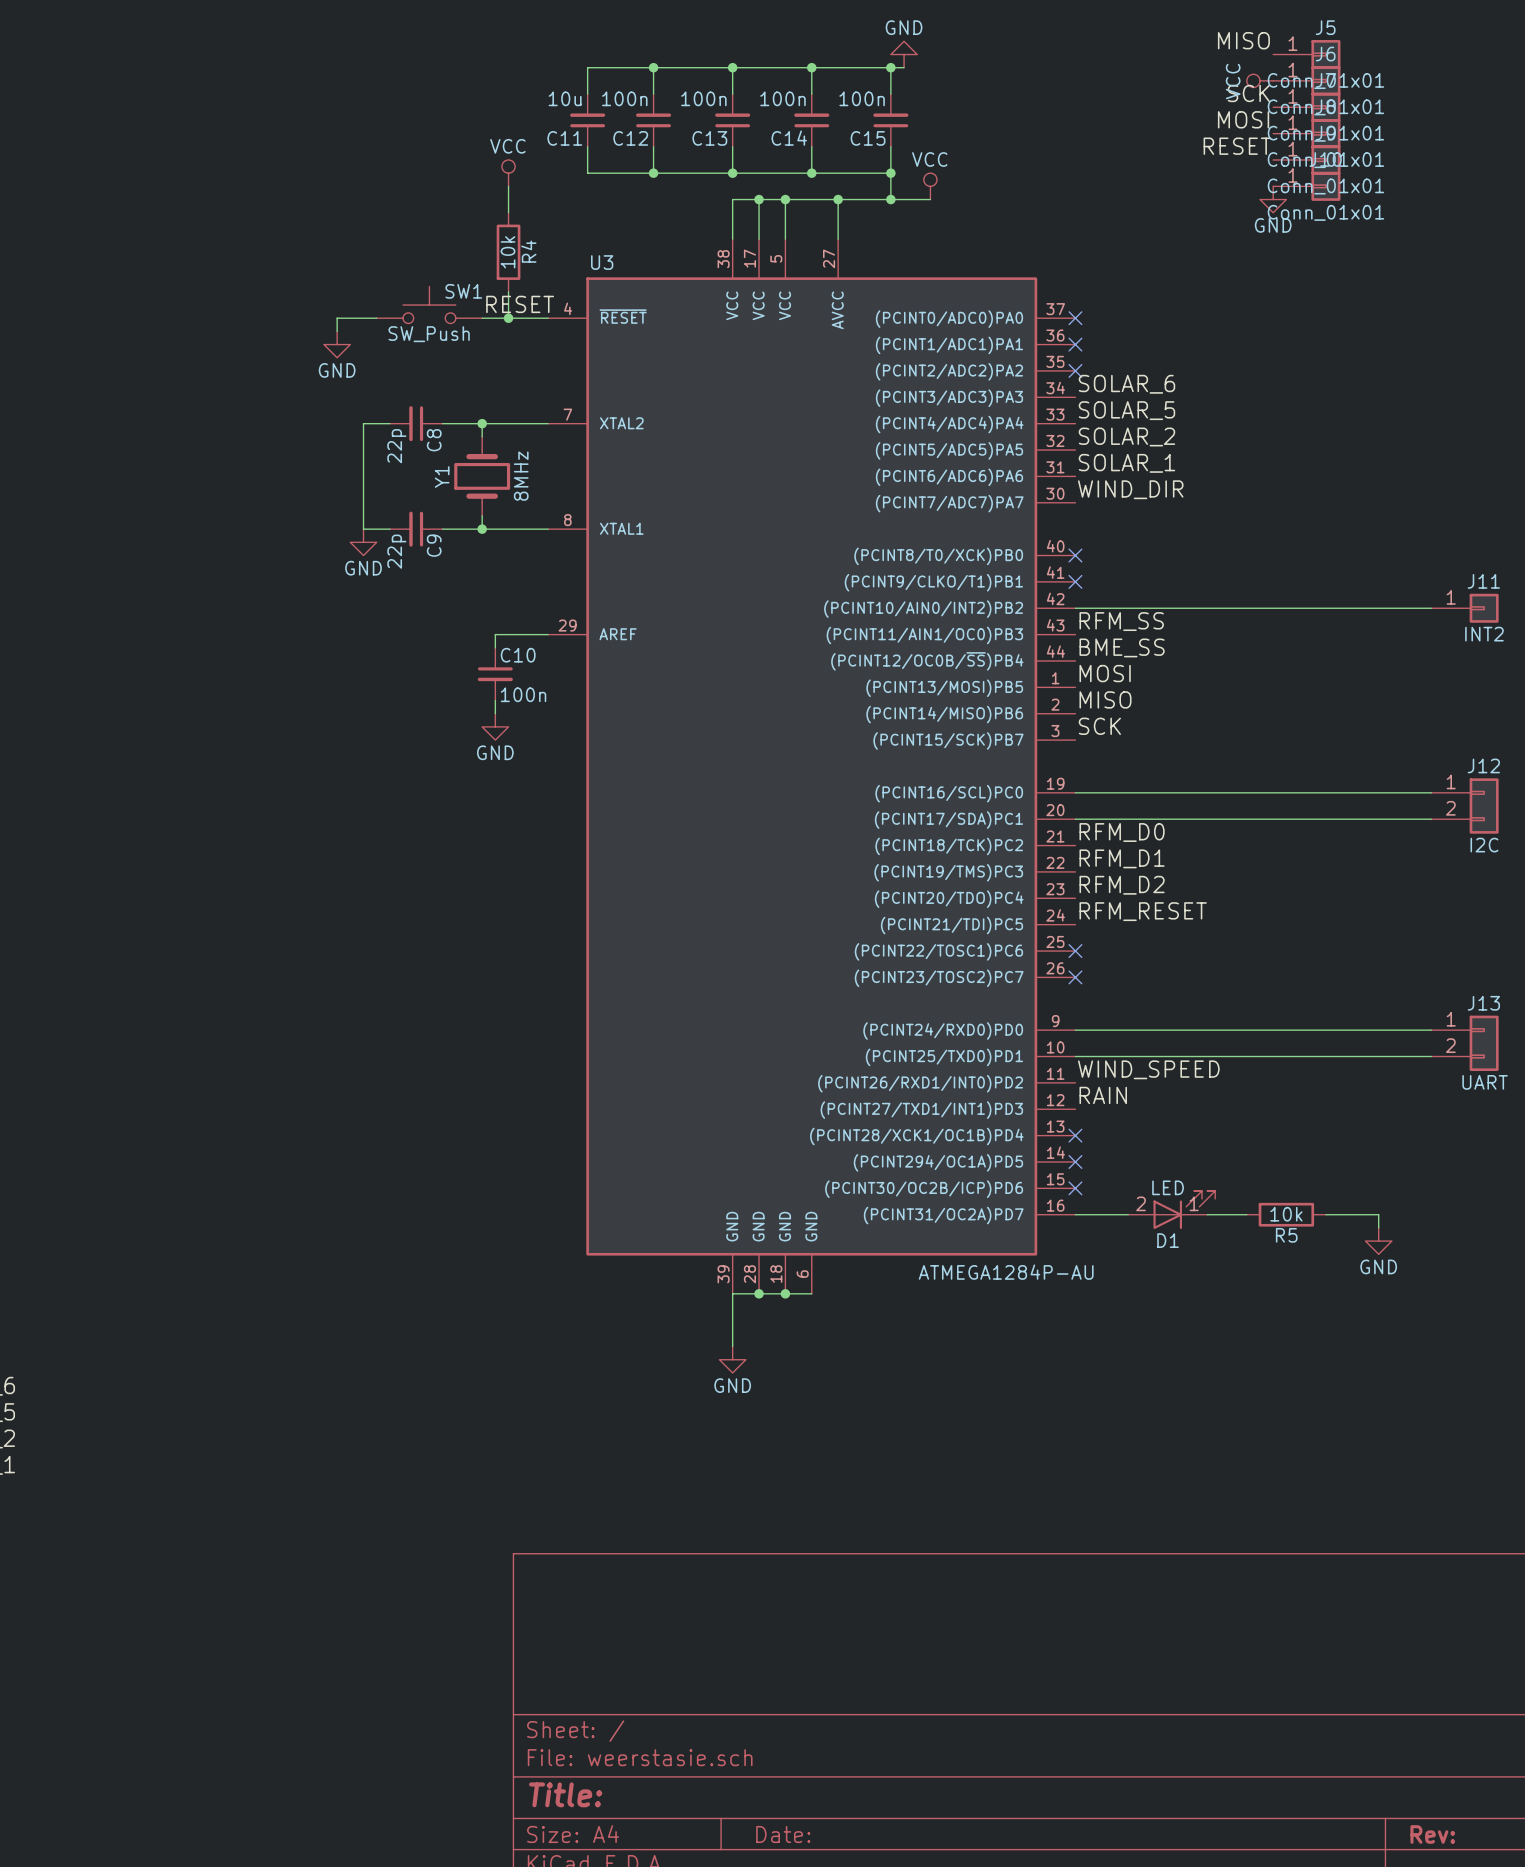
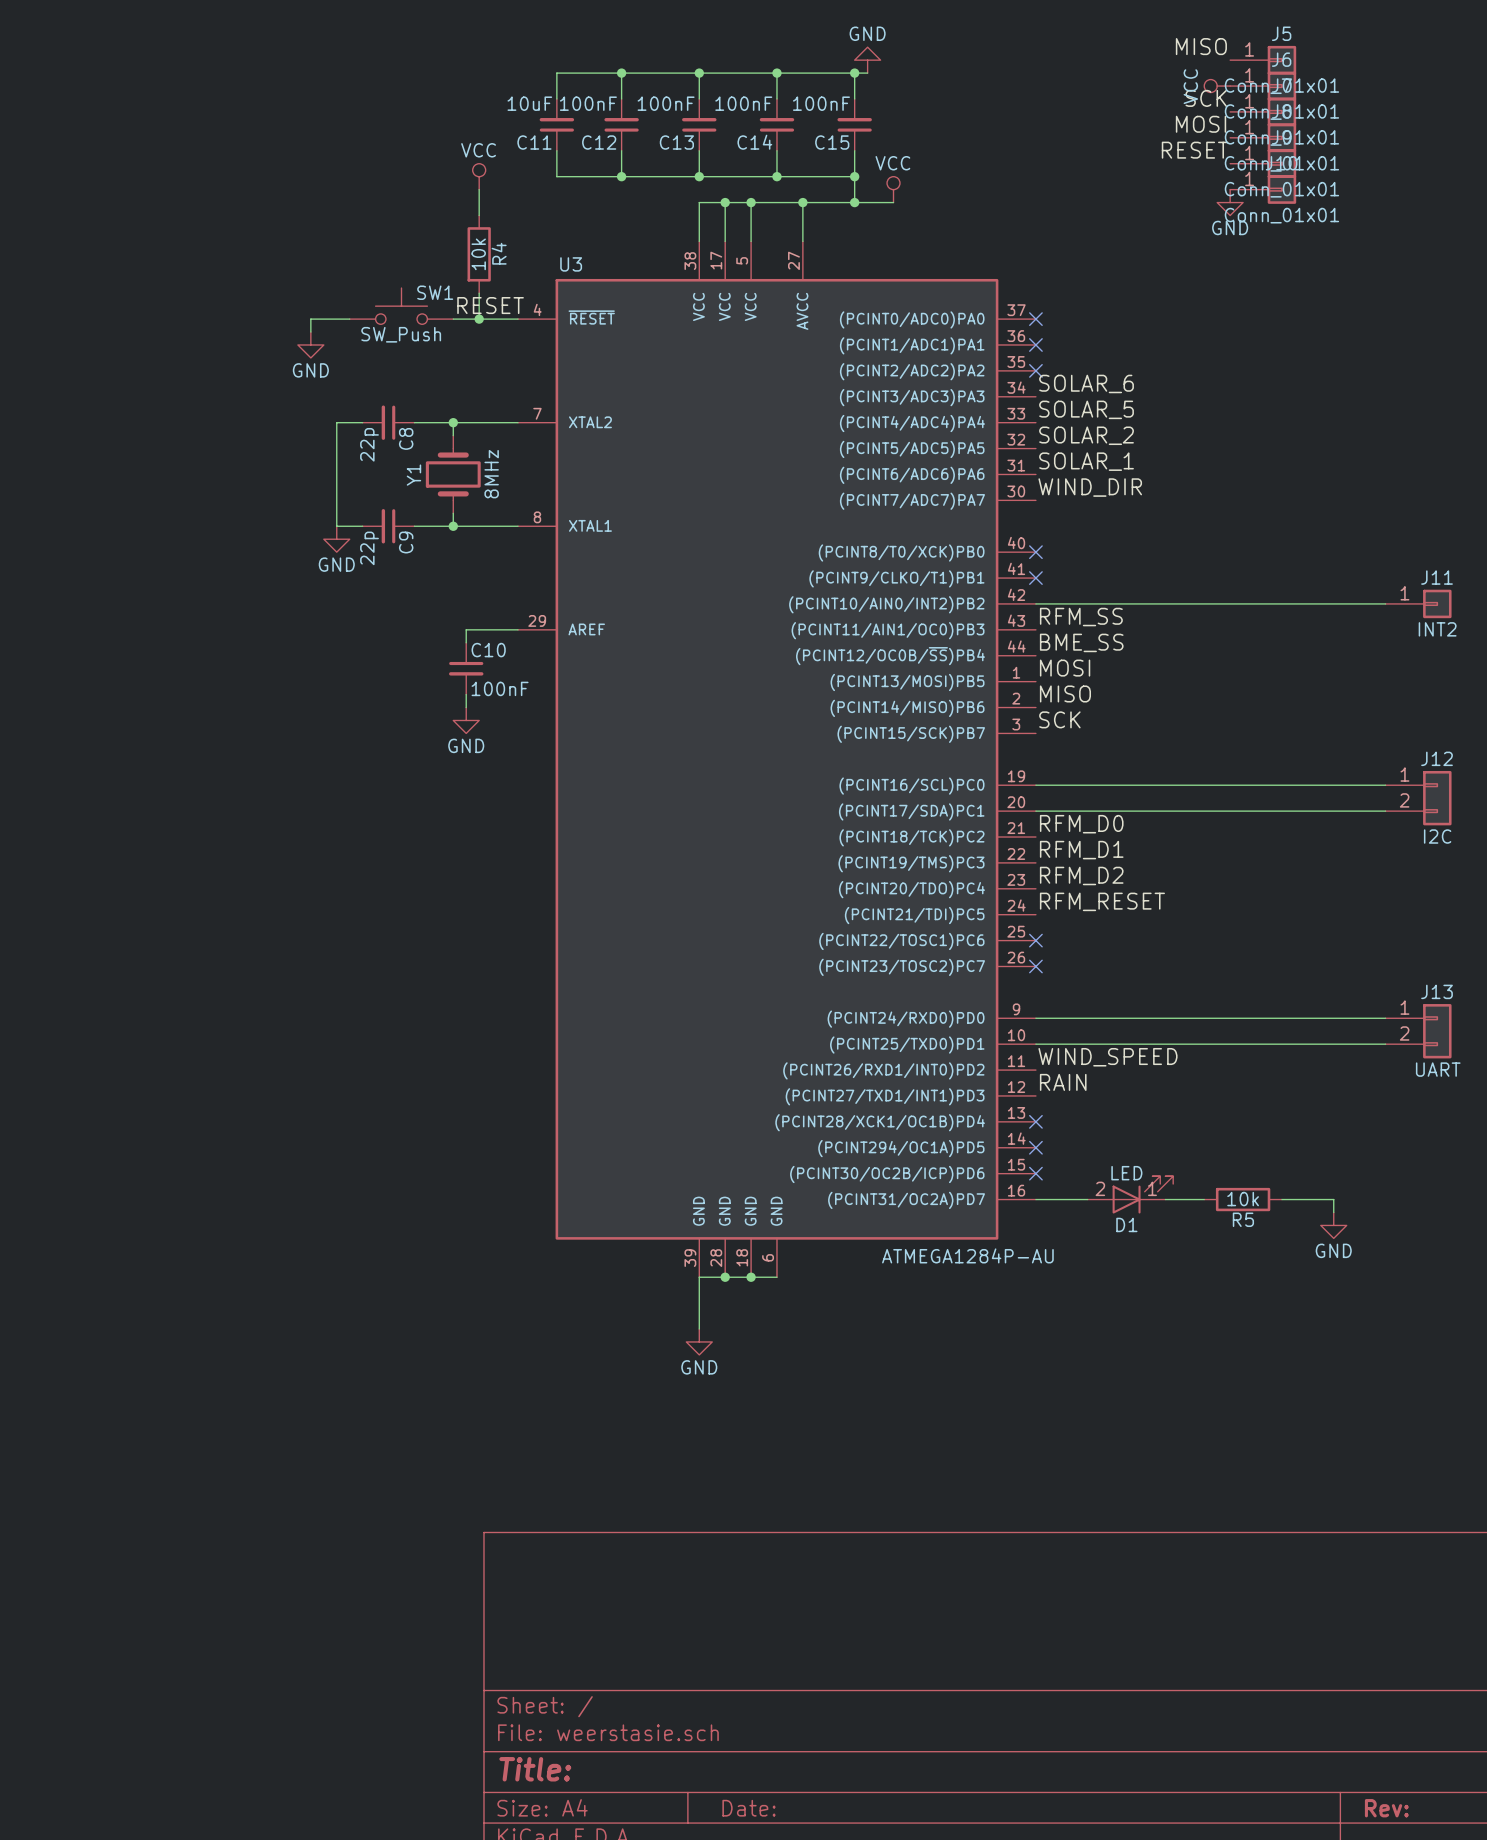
C11 value: 10u (565, 98) -> 10uF (529, 103)
C12 value: 100n (624, 98) -> 100nF (588, 103)
C13 value: 100n (703, 98) -> 100nF (666, 103)
C14 value: 100n (782, 98) -> 100nF (743, 103)
C15 value: 100n (862, 98) -> 100nF (821, 103)
C10 value: 100n (523, 694) -> 100nF (500, 688)

